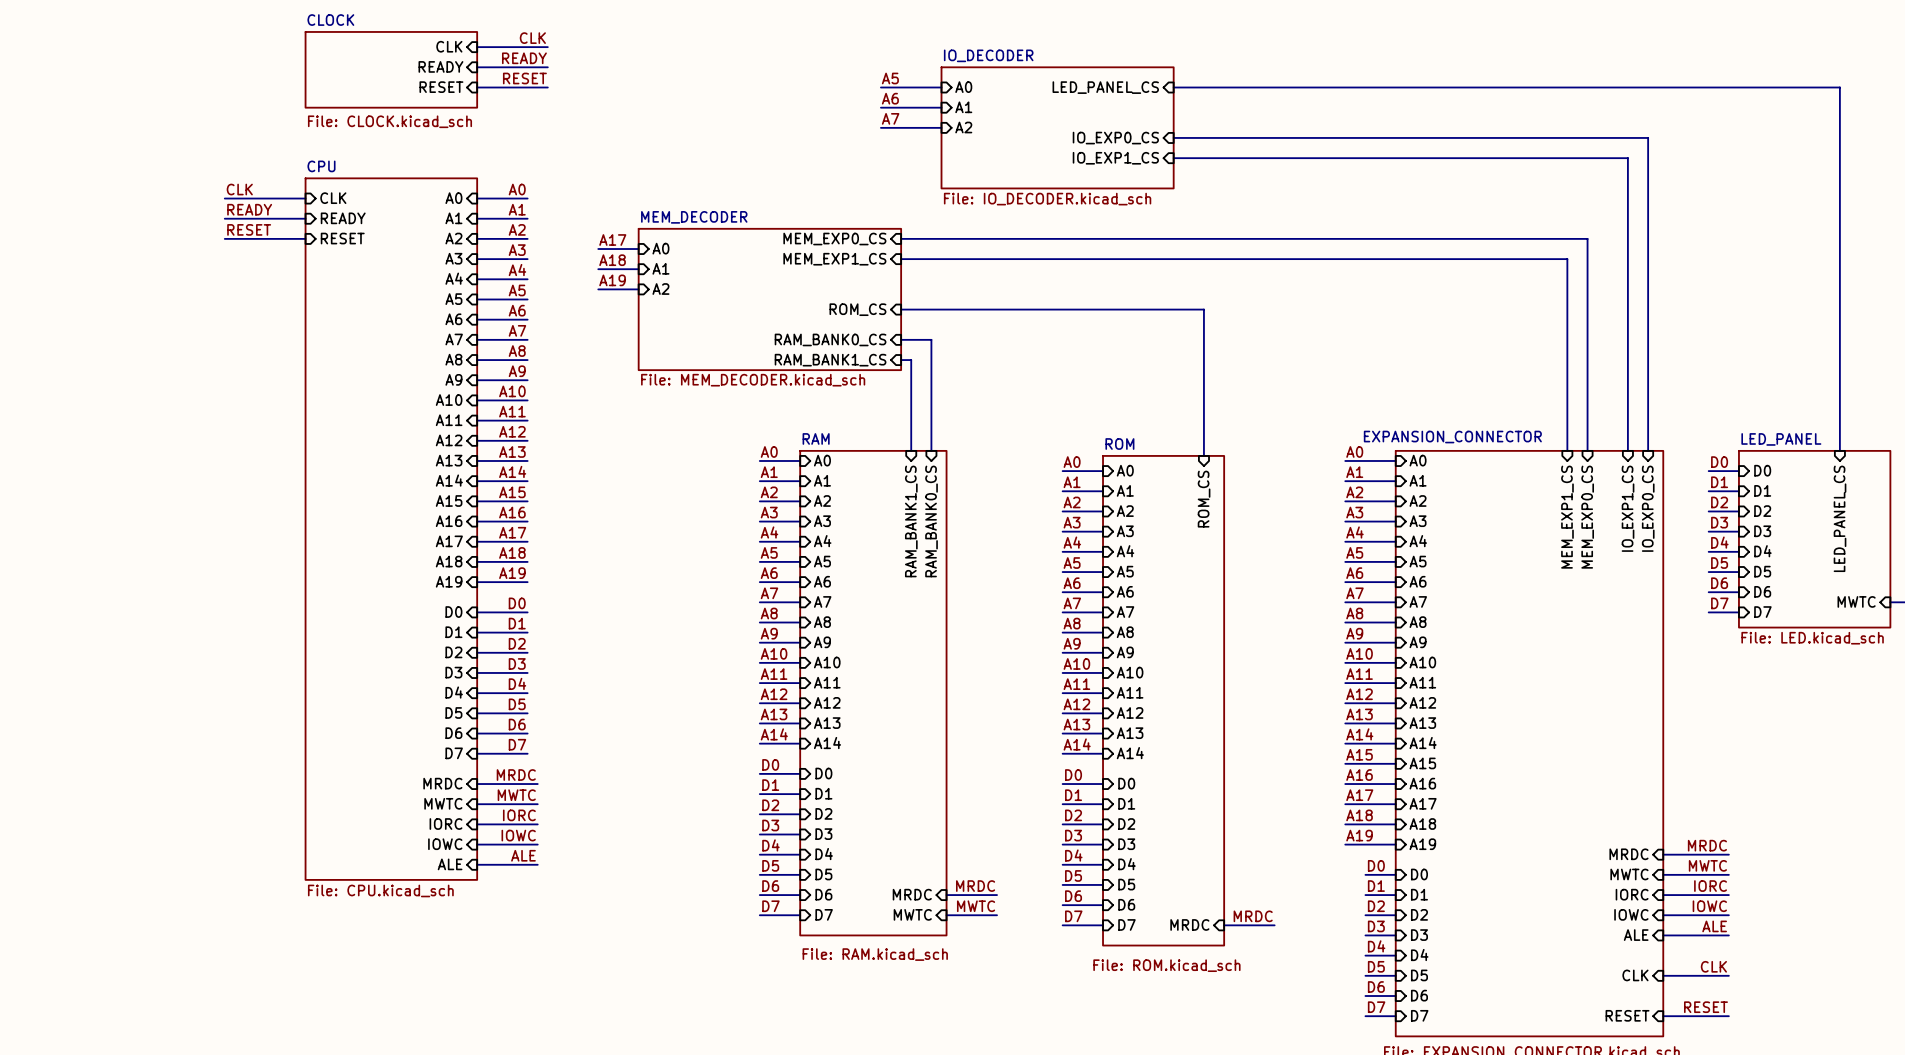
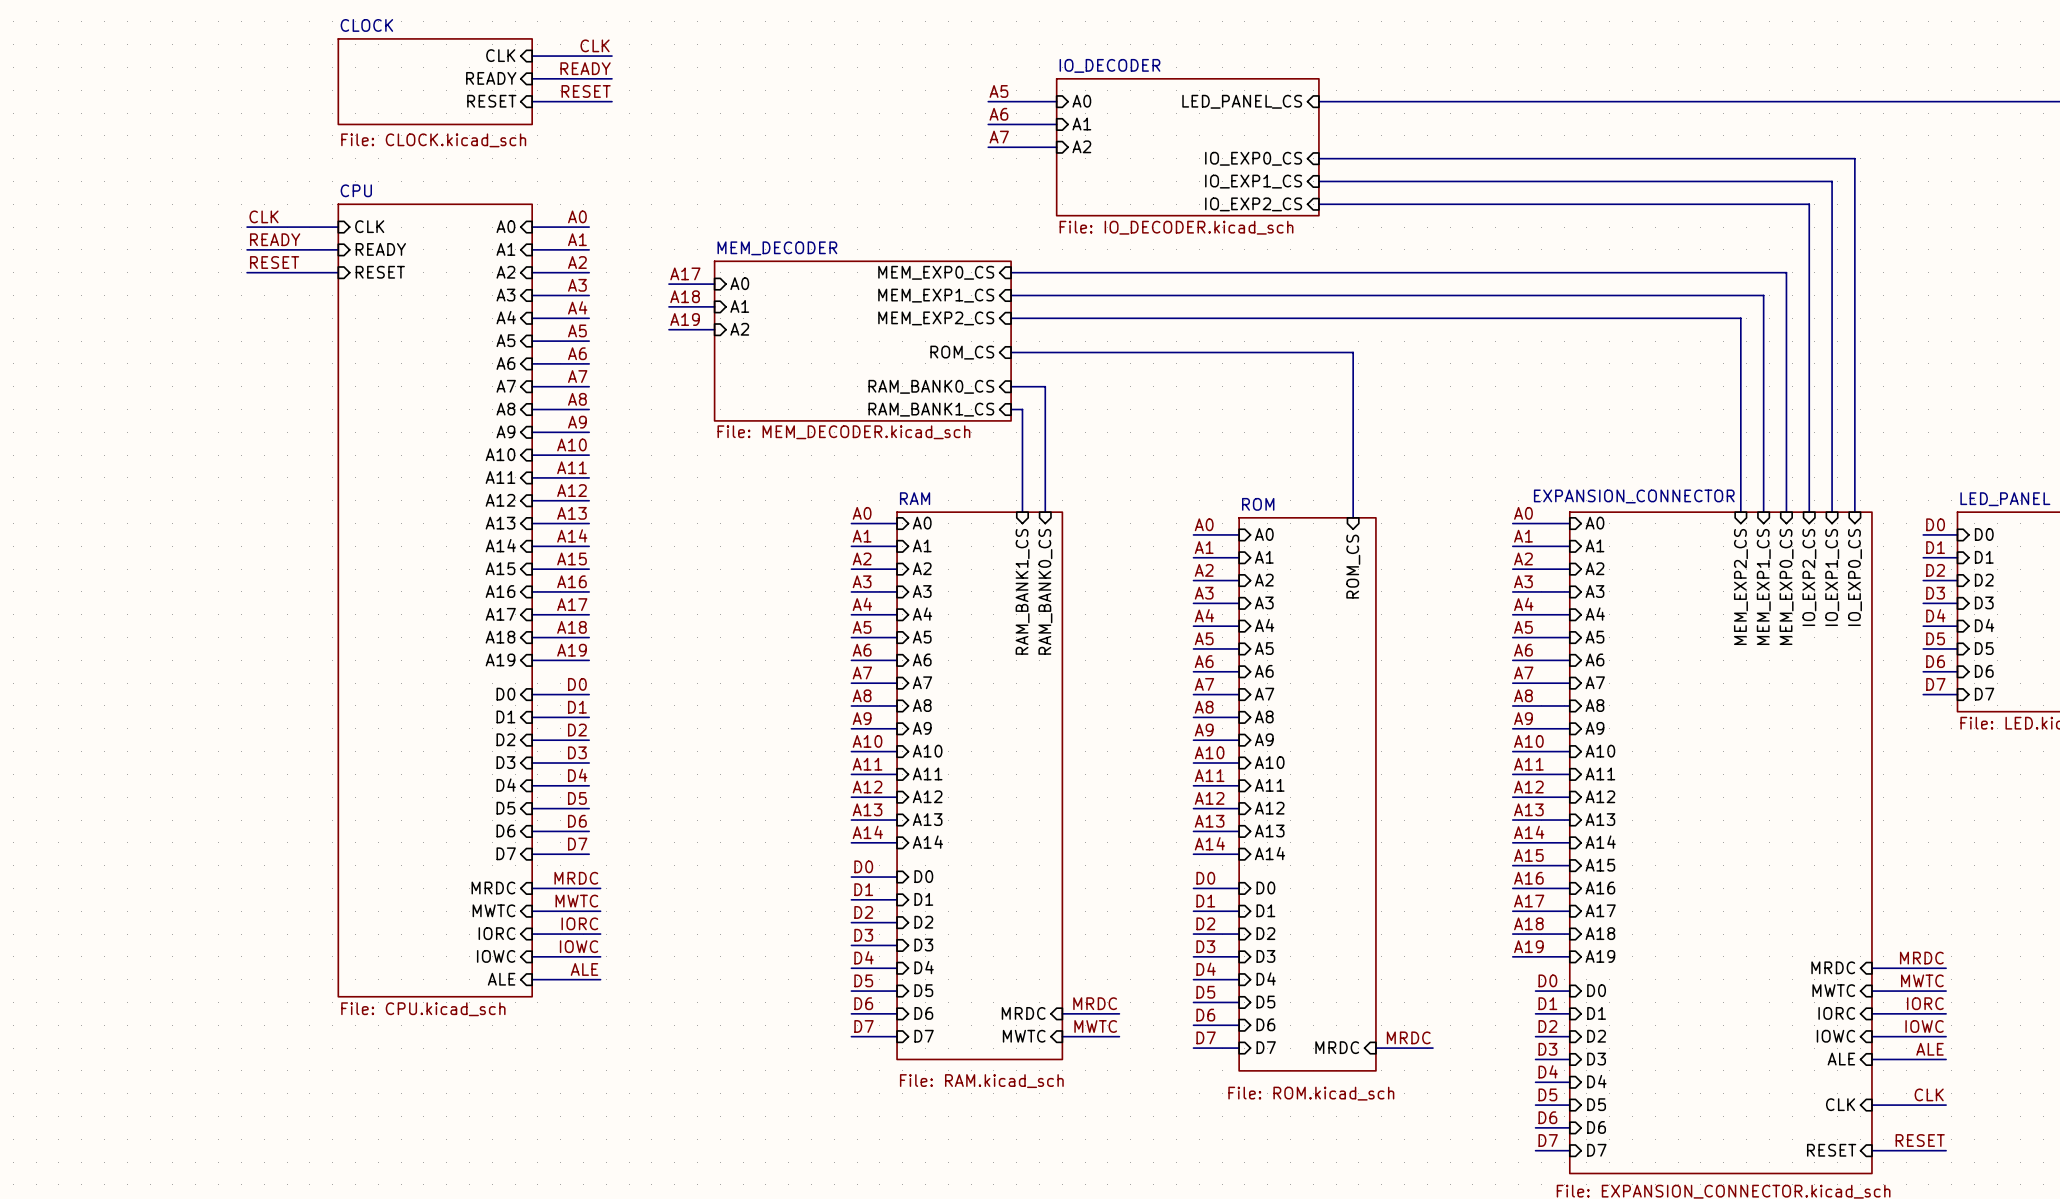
sheet pin: none -> IO_EXP2_CS (1253, 204)
wire: none -> (1318, 204) (1809, 204) (1809, 512)
sheet pin: none -> MEM_EXP2_CS (936, 318)
wire: none -> (1011, 318) (1740, 318) (1740, 512)
sheet pin: none -> IO_EXP2_CS (1809, 577)
sheet pin: none -> MEM_EXP2_CS (1740, 586)

